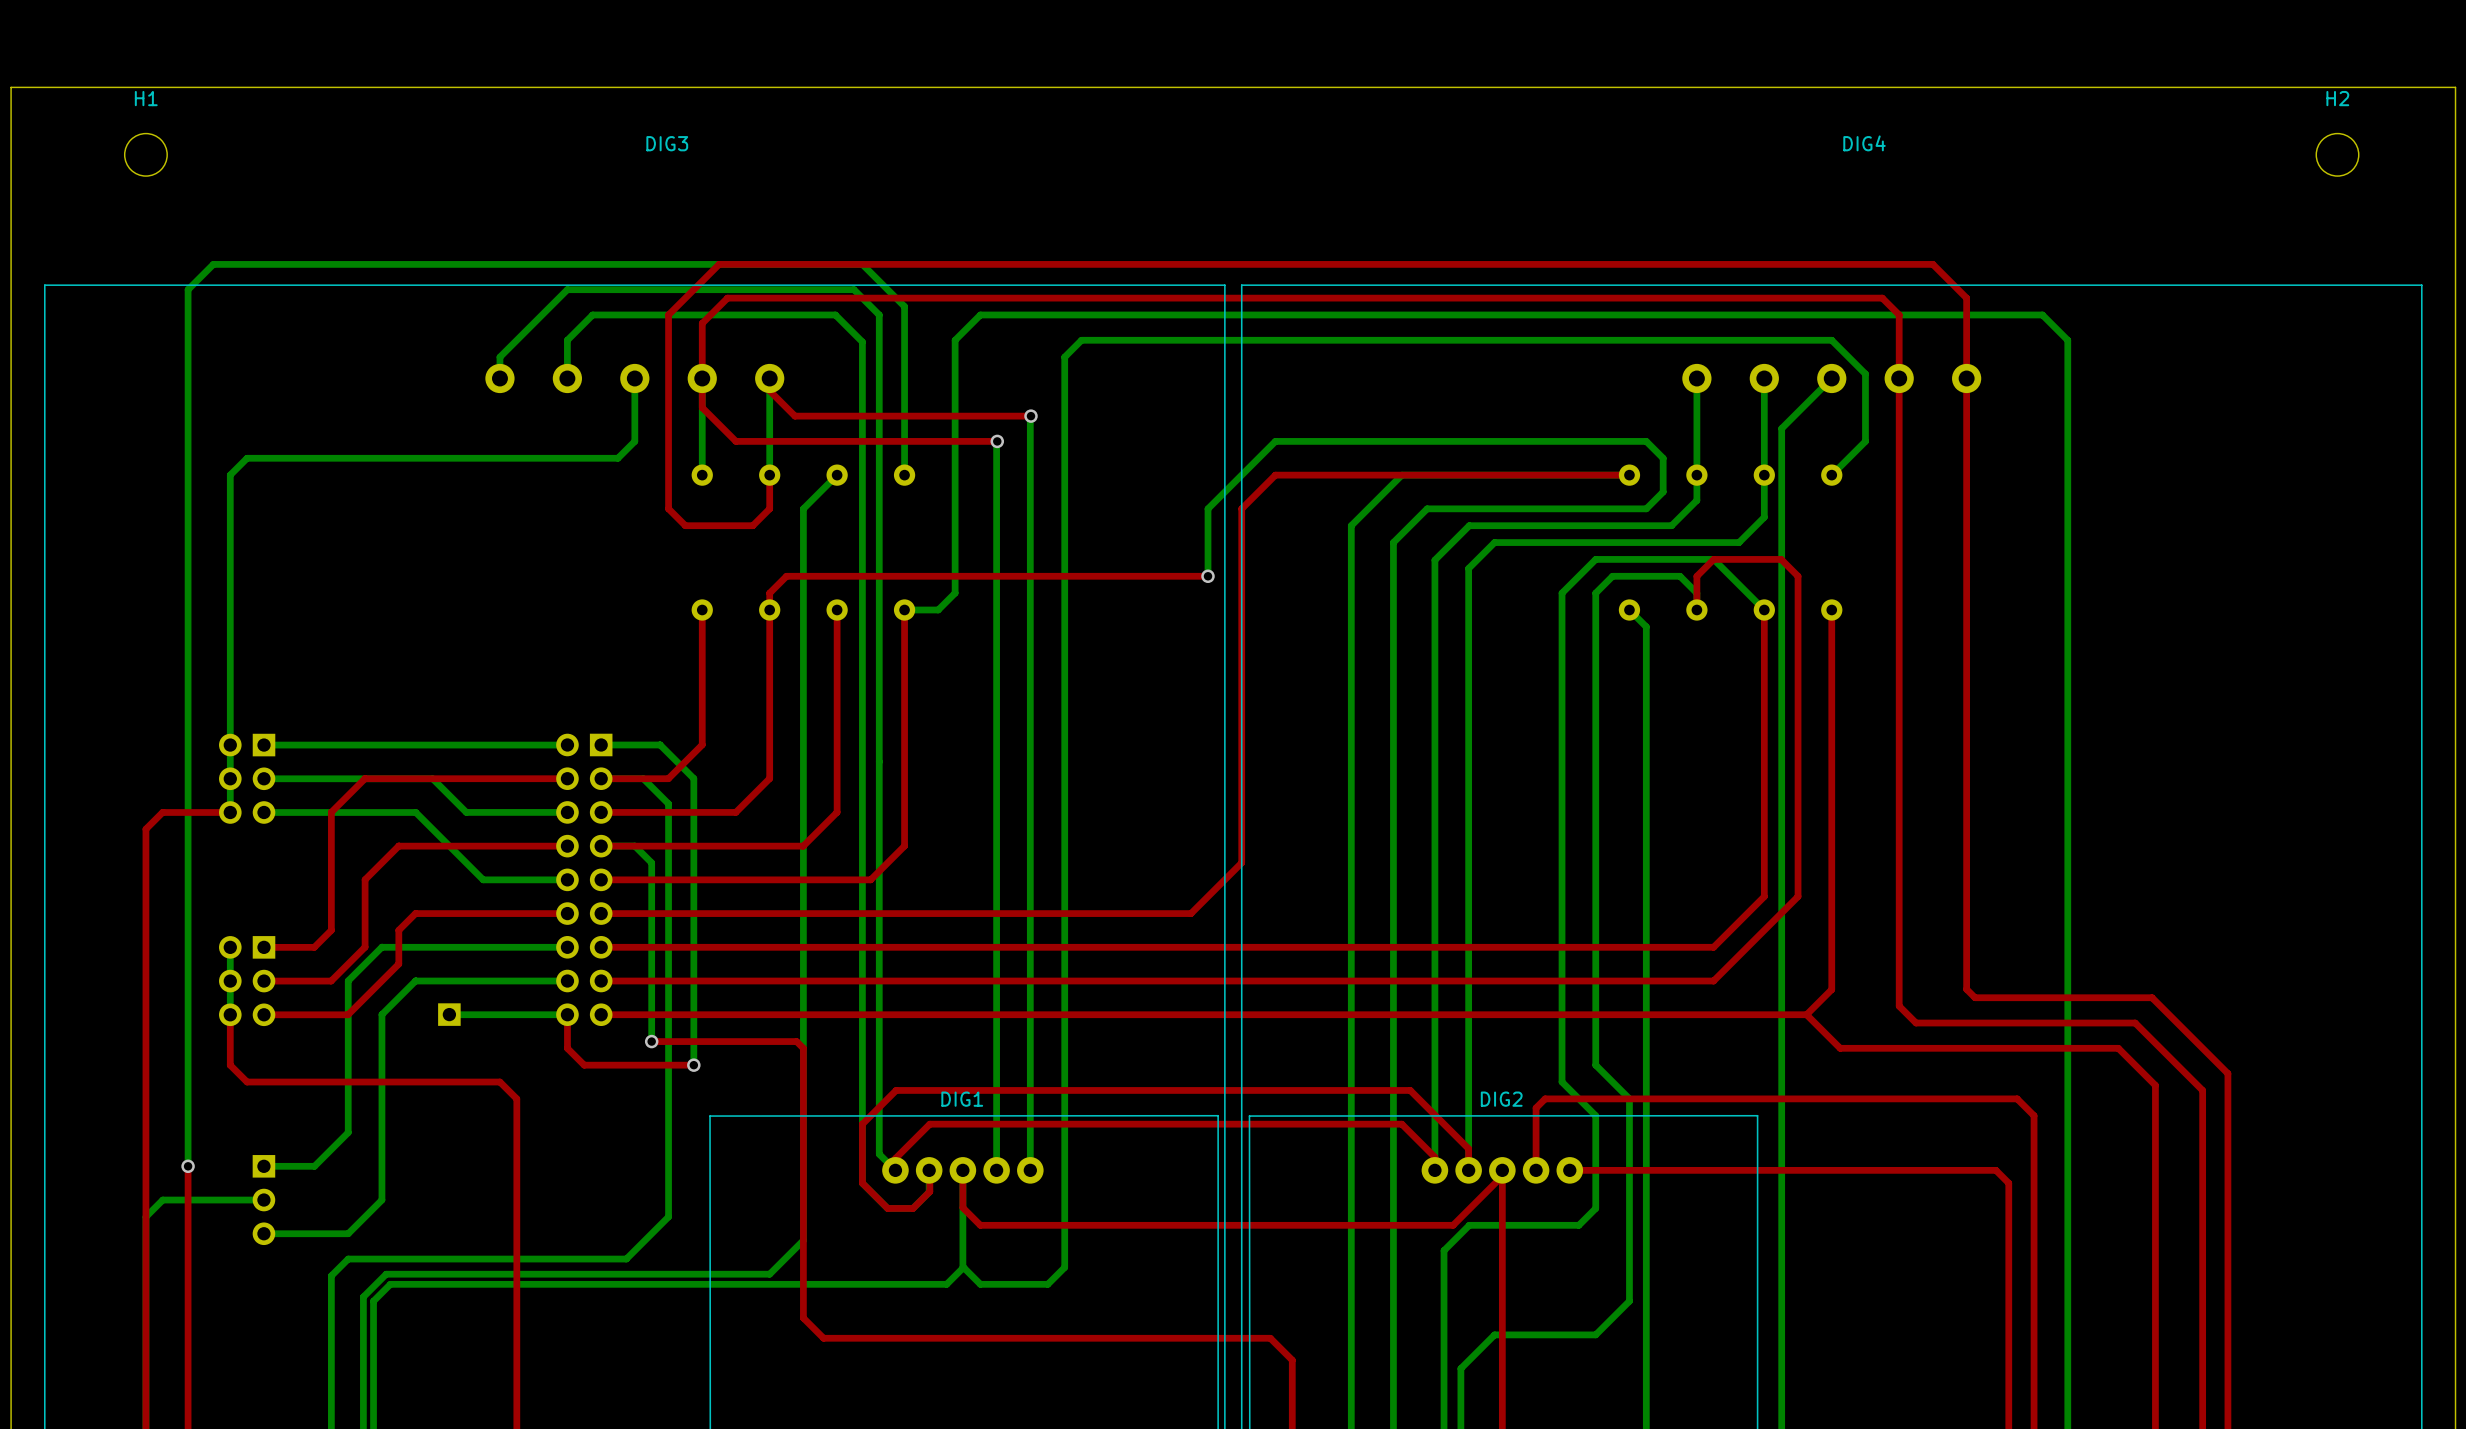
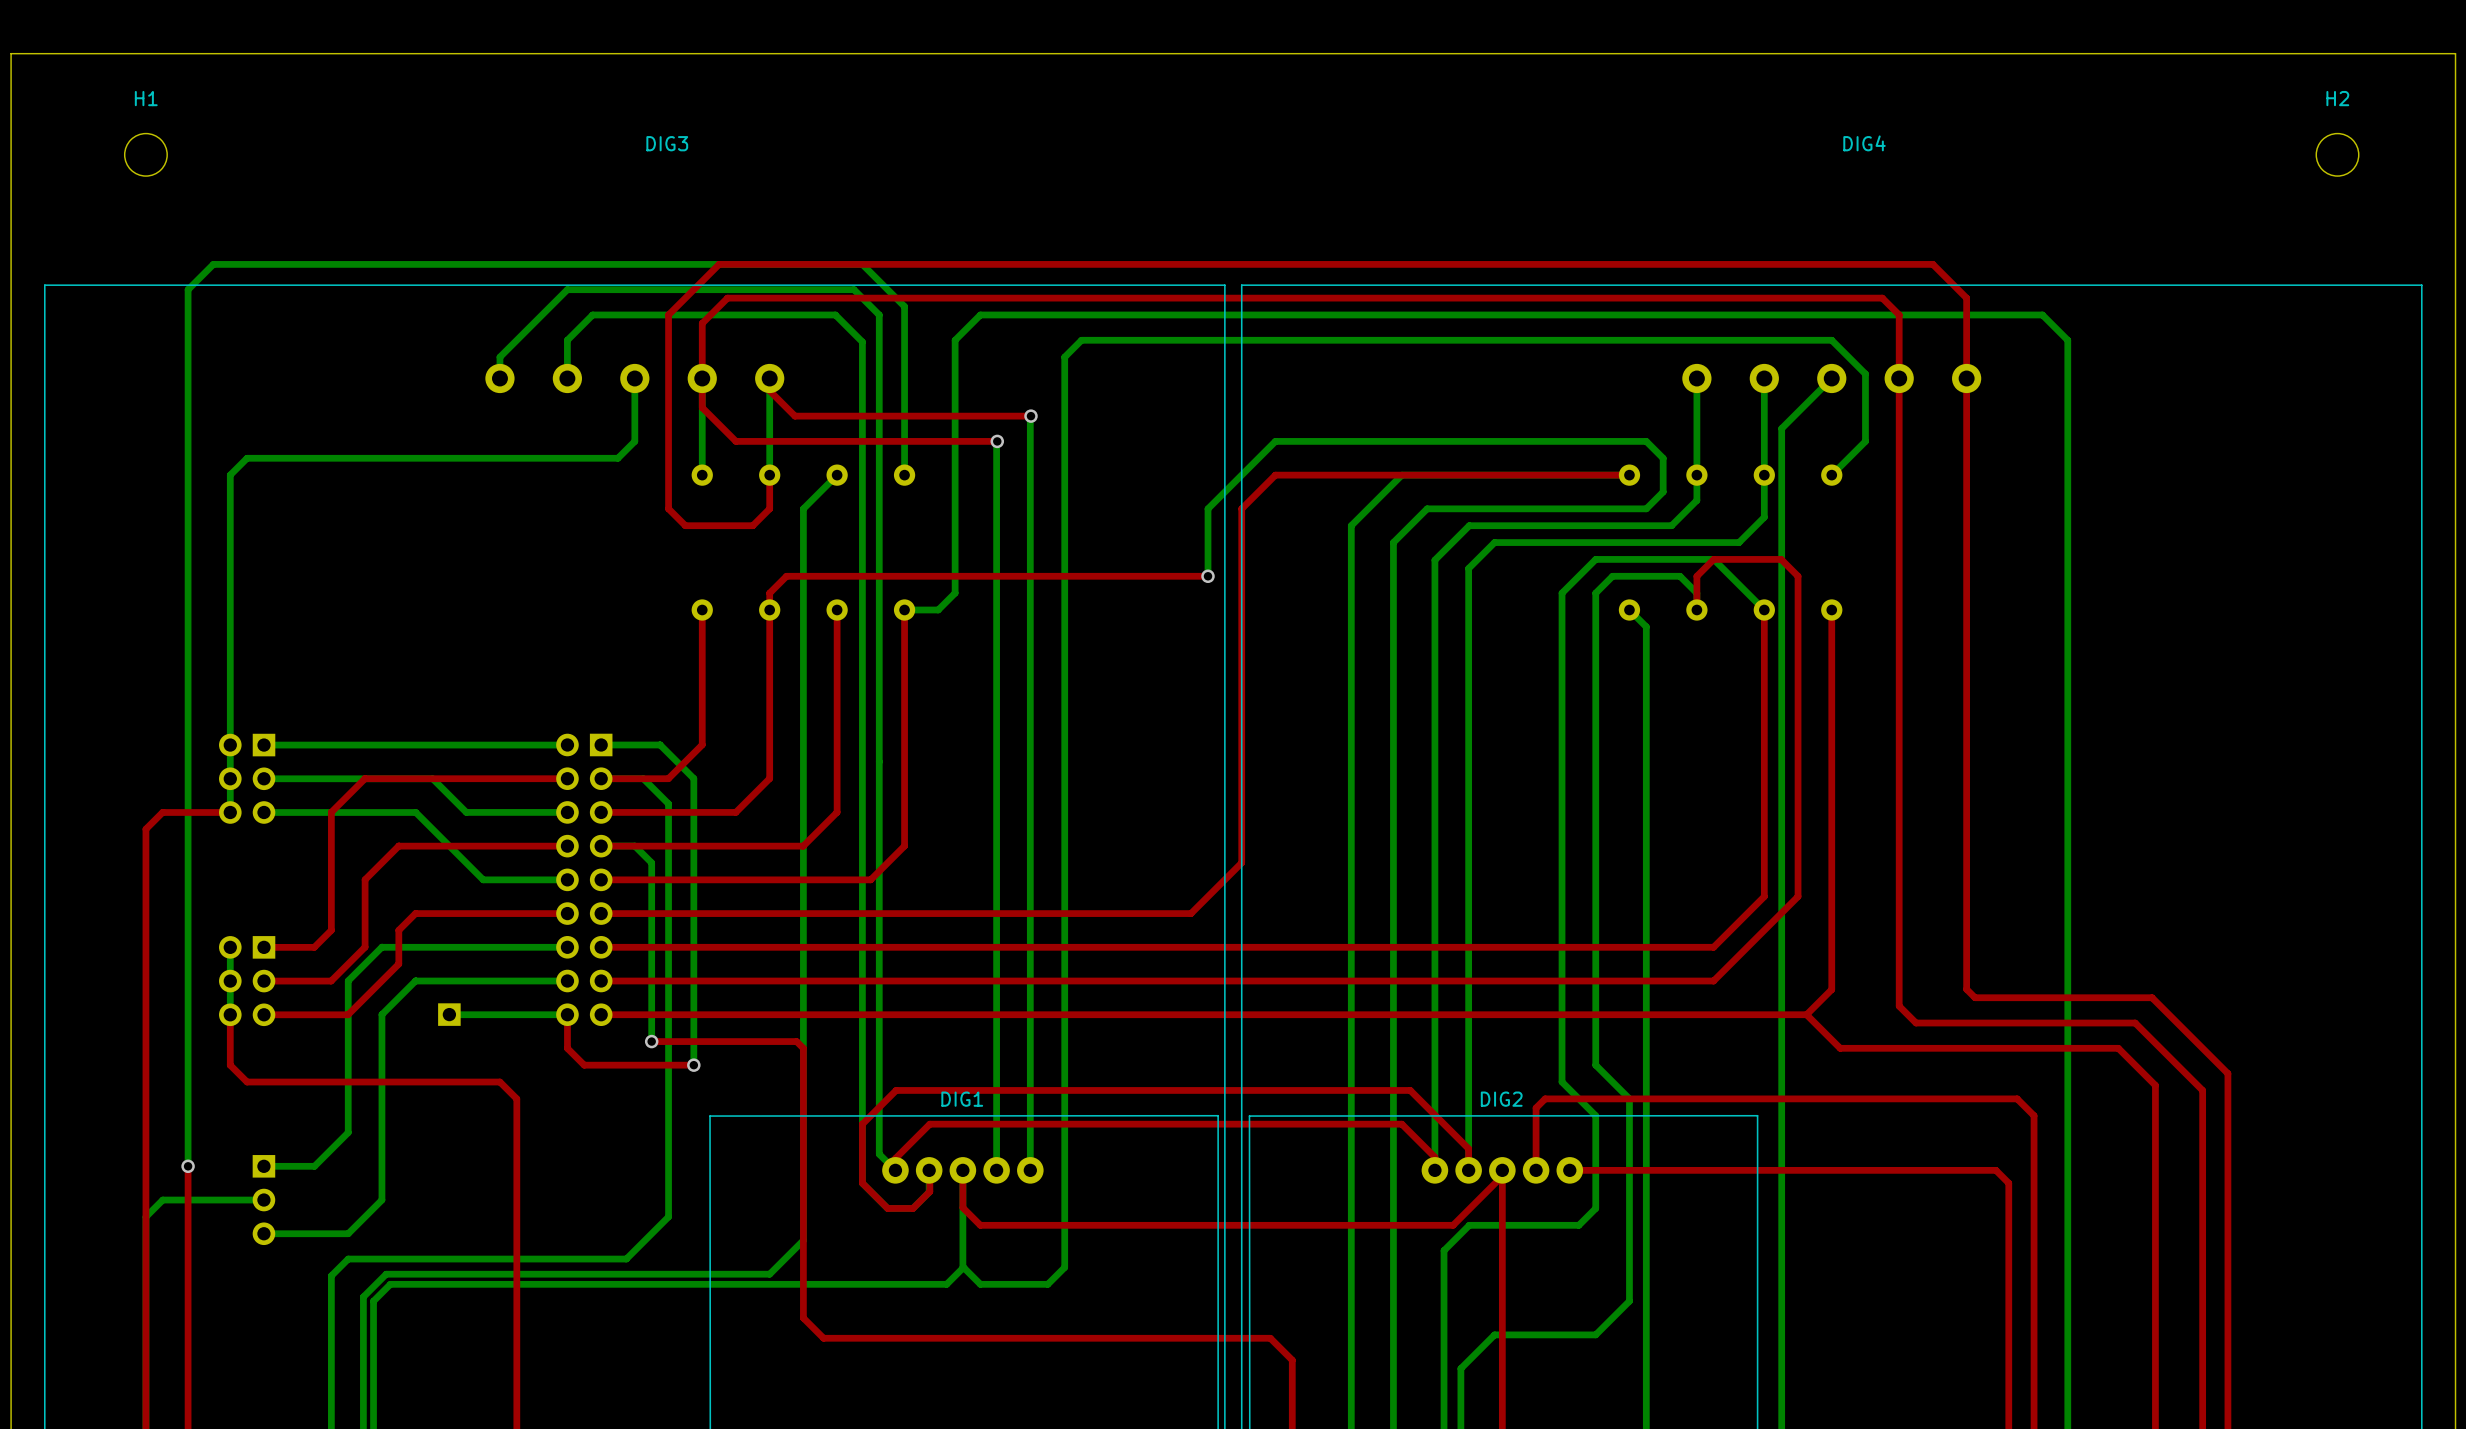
board edge: (11, 87) (2455, 87) -> (11, 87) (11, 53) (2455, 53) (2455, 87)

